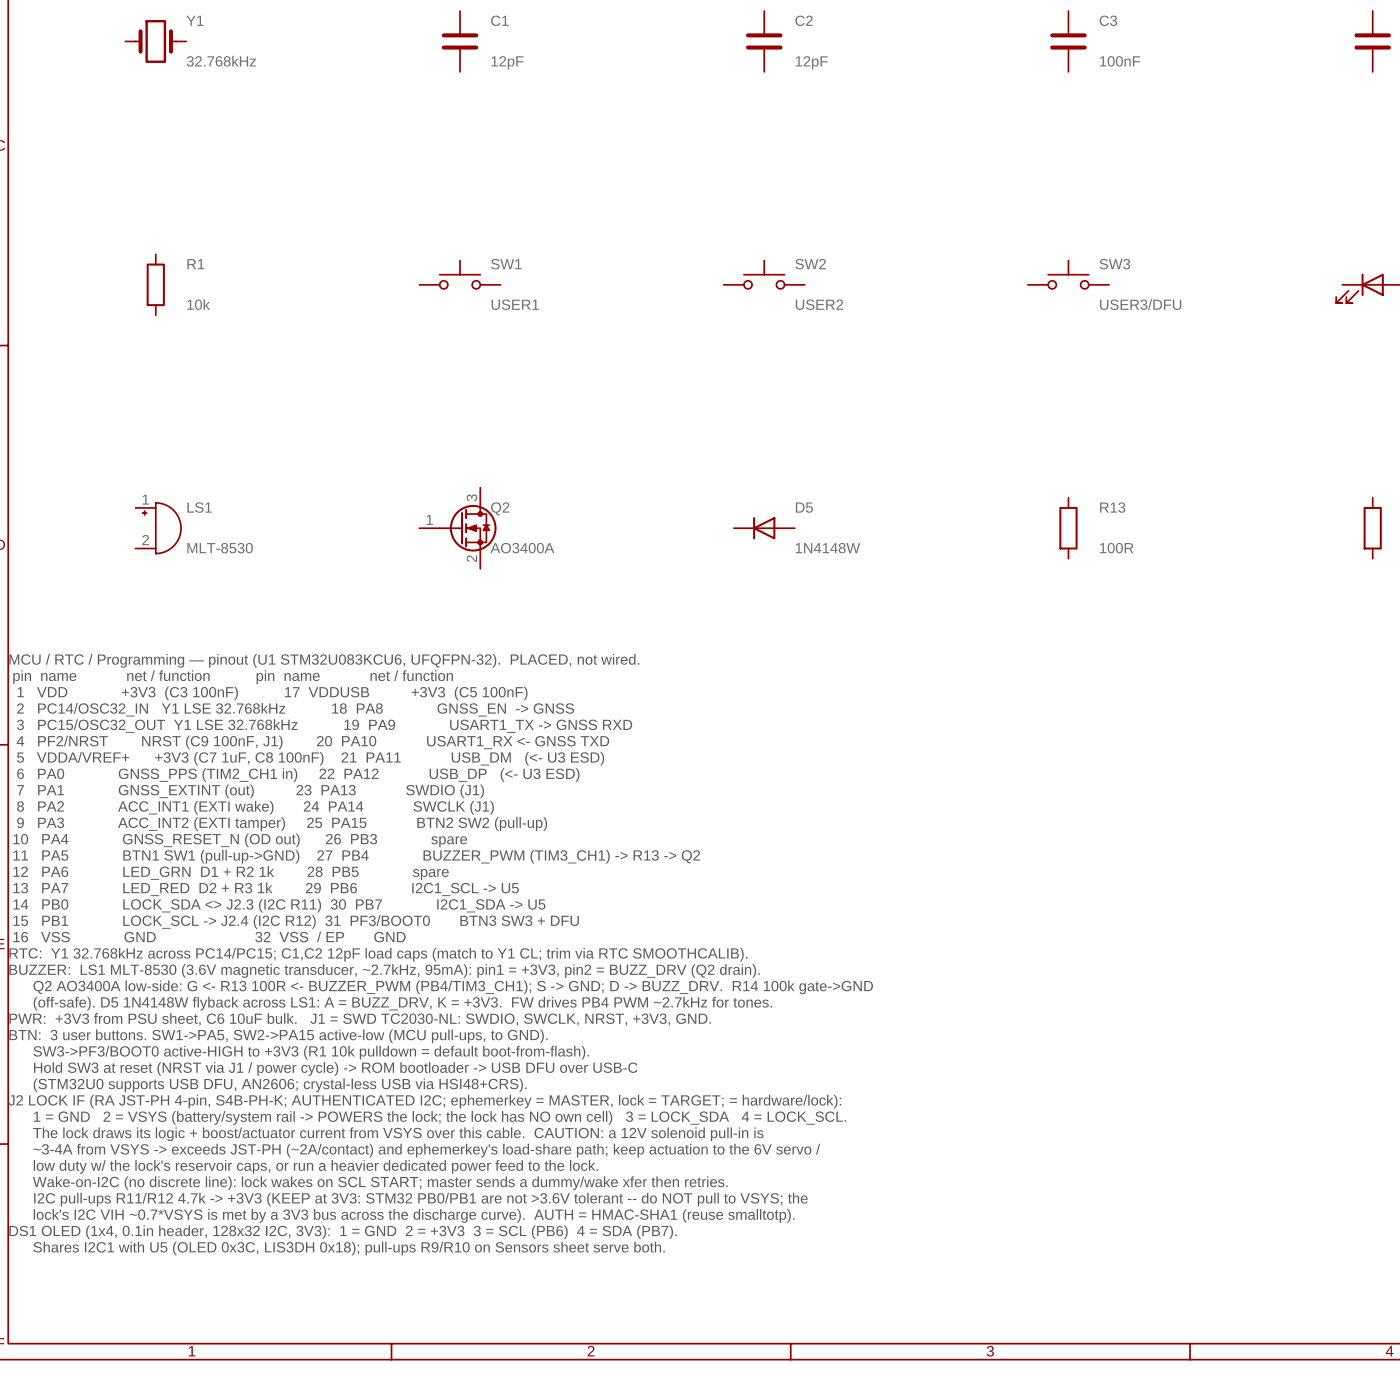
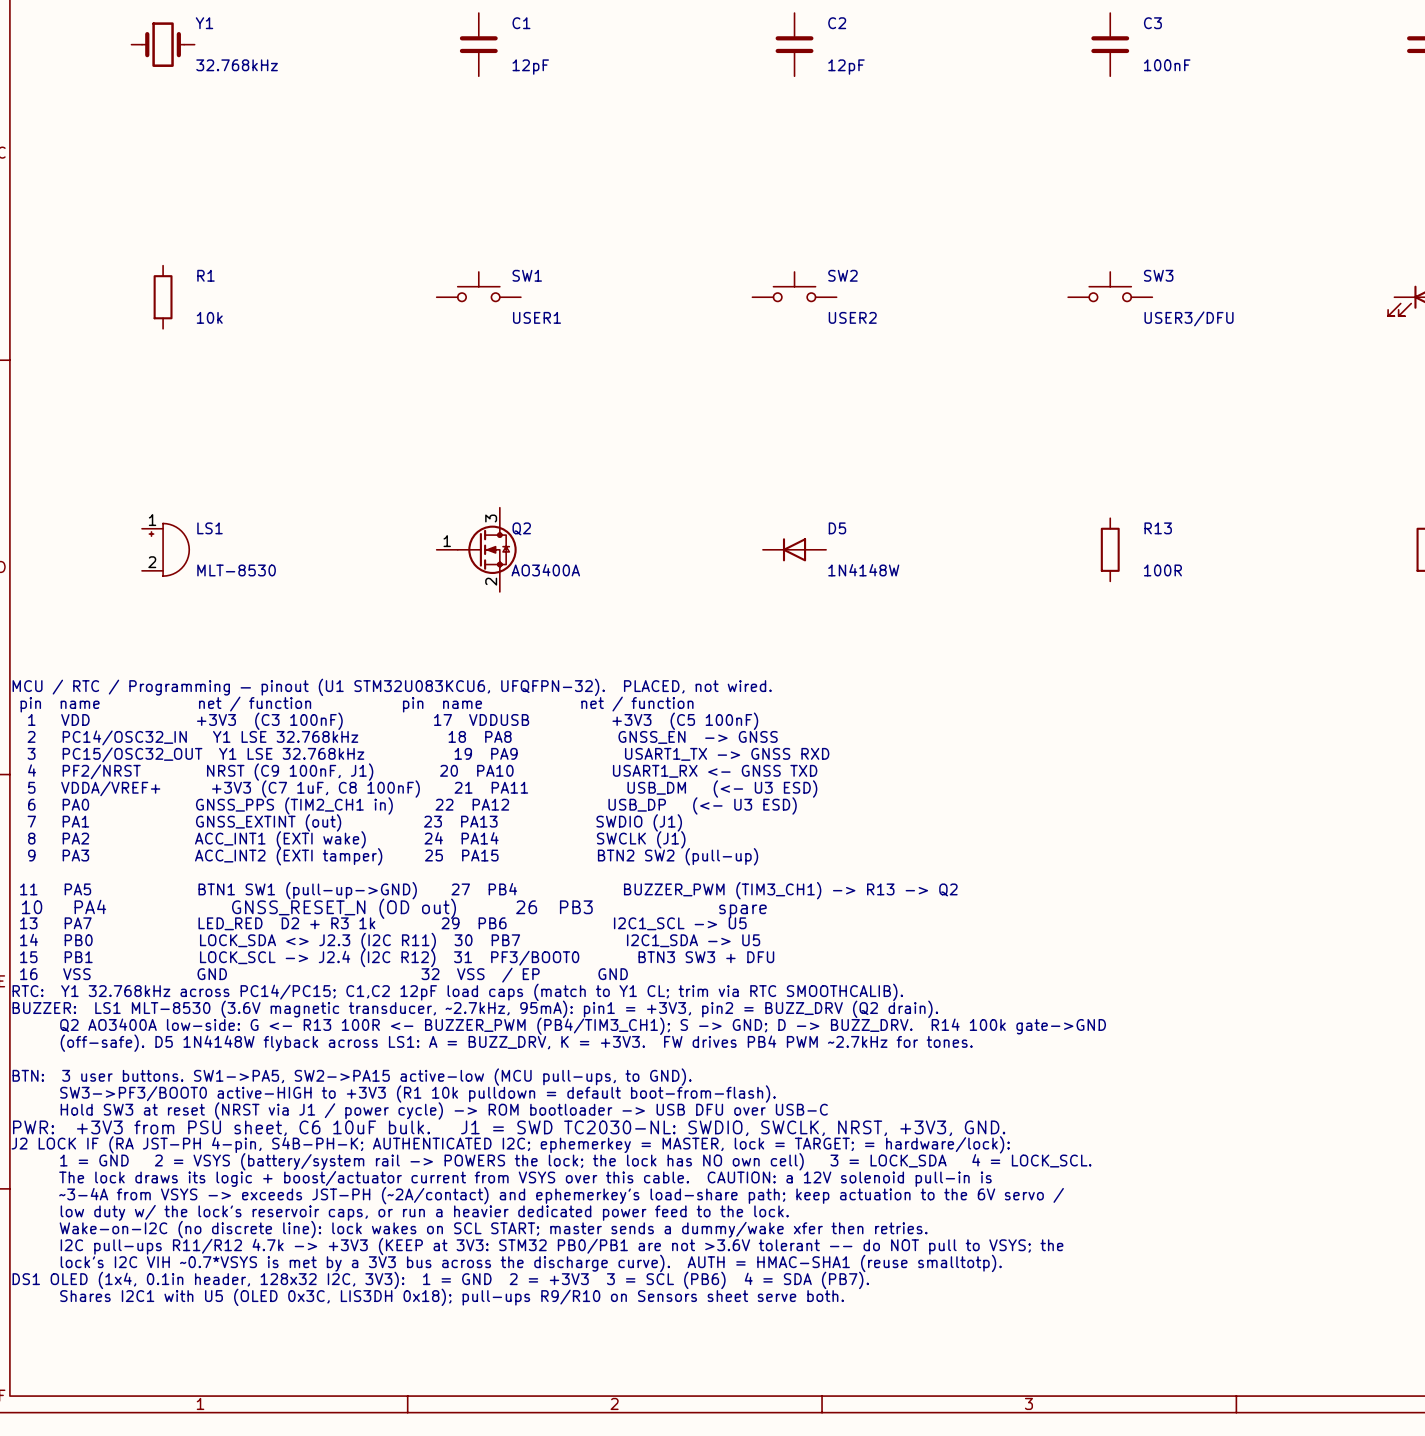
text: 10 PA4 GNSS_RESET_N (OD out) 26 PB3 spare (240, 840) -> none
text: 12 PA6 LED_GRN D1 + R2 1k 28 PB5 spare (231, 873) -> 10 PA4 GNSS_RESET_N (OD out) 26 PB3 spare (394, 908)
text: PWR: +3V3 from PSU sheet, C6 10uF bulk. J1 = SWD TC2030-NL: SWDIO, SWCLK, NRST, +3V3, GND. (360, 1019) -> none
text: (STM32U0 supports USB DFU, AN2606; crystal-less USB via HSI48+CRS). (280, 1085) -> PWR: +3V3 from PSU sheet, C6 10uF bulk. J1 = SWD TC2030-NL: SWDIO, SWCLK, NRST, +3V3, GND. (509, 1128)

